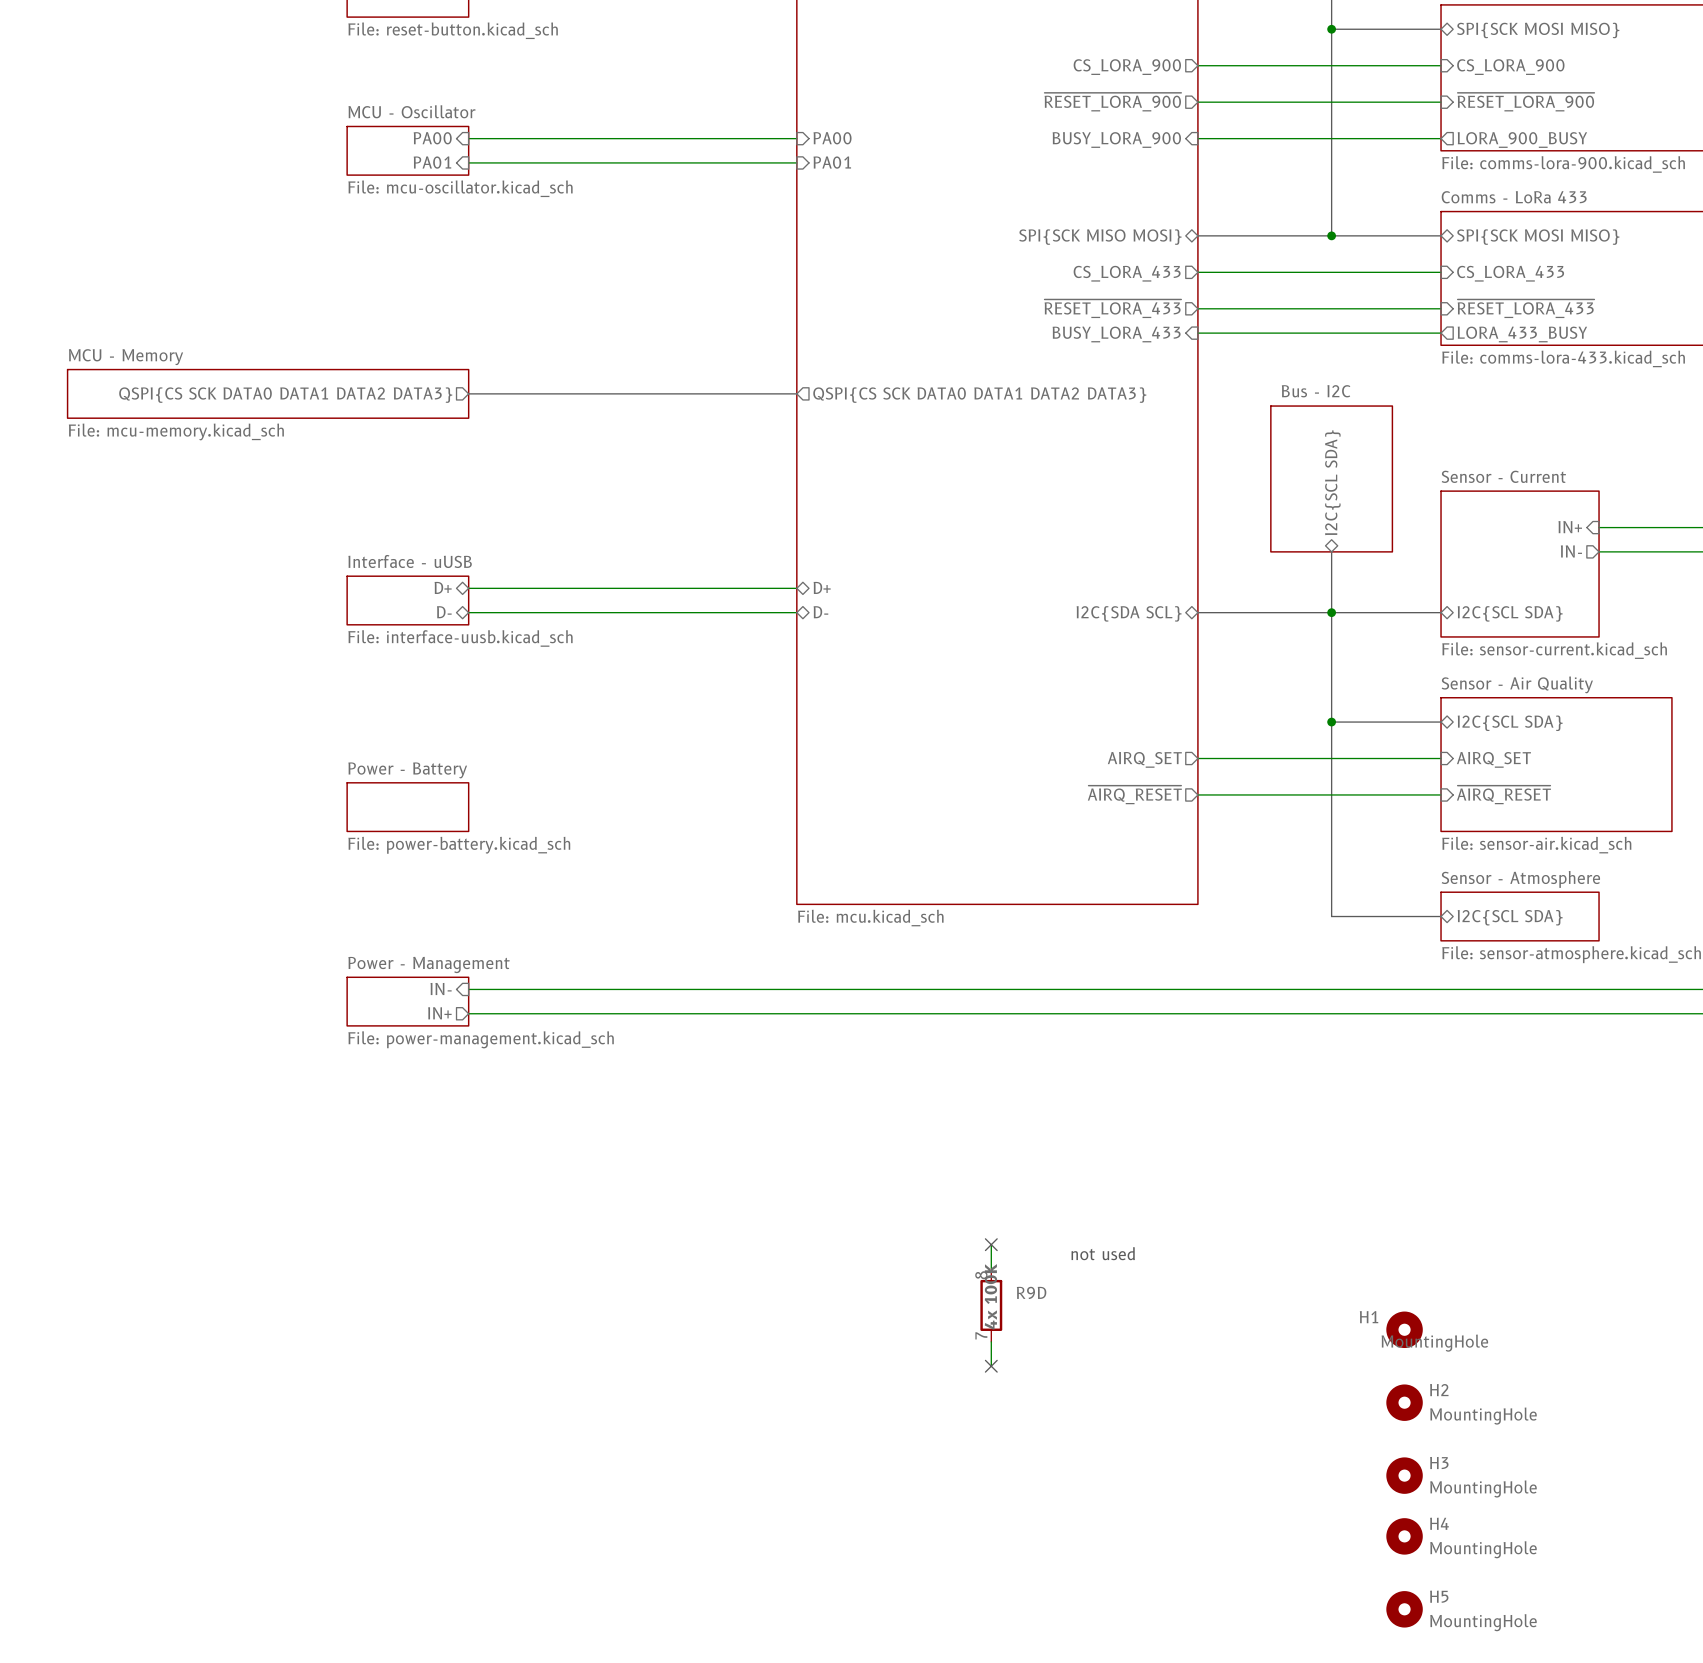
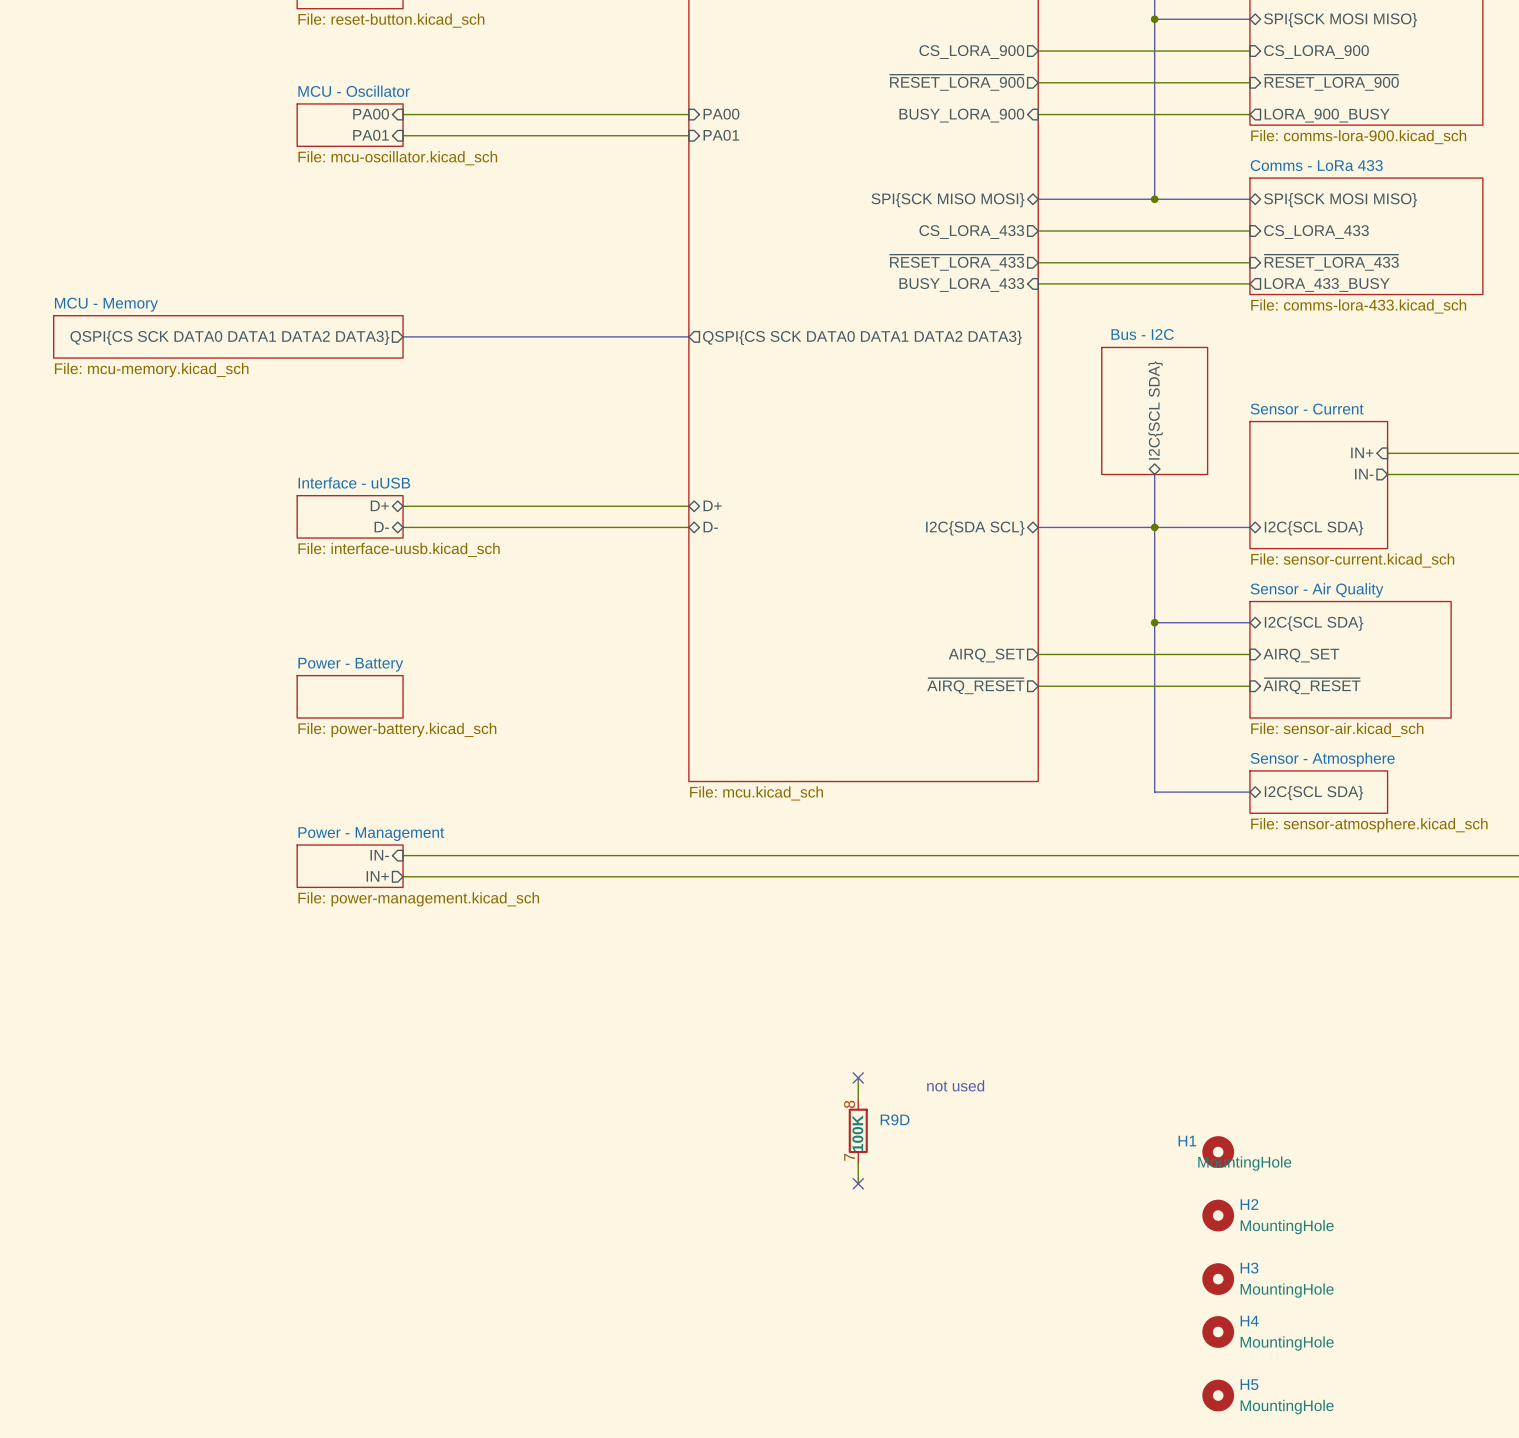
R9D value: 4x 100K (990, 1296) -> 100K (857, 1133)

